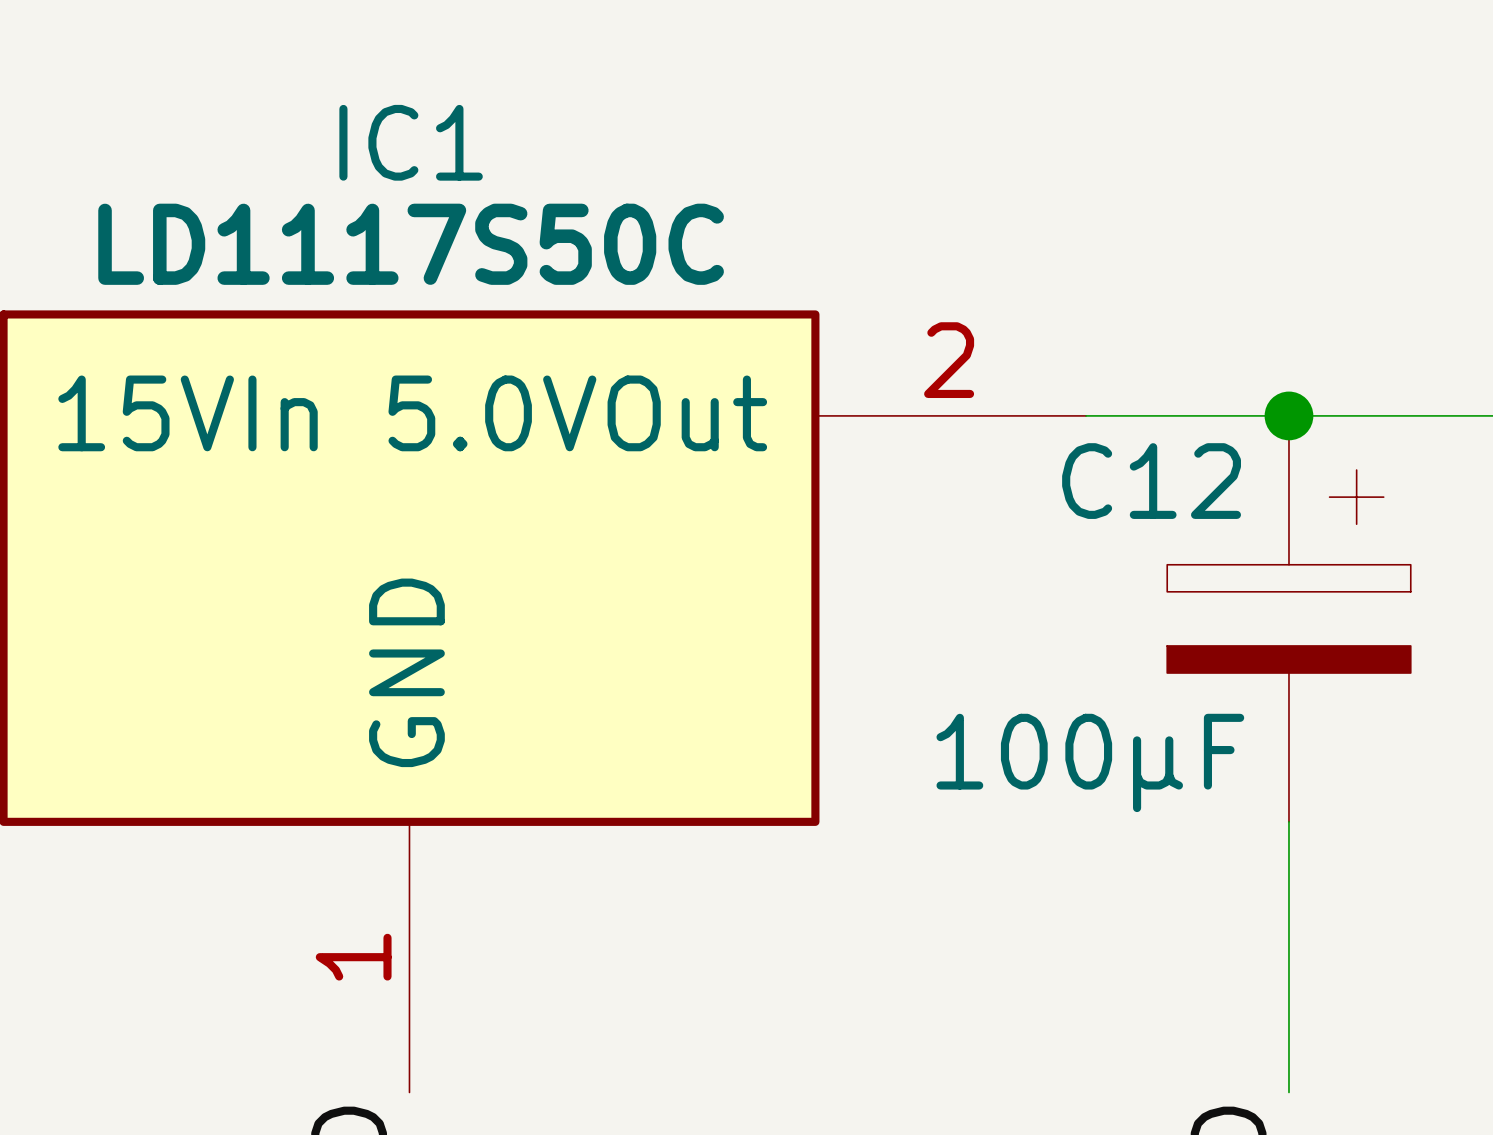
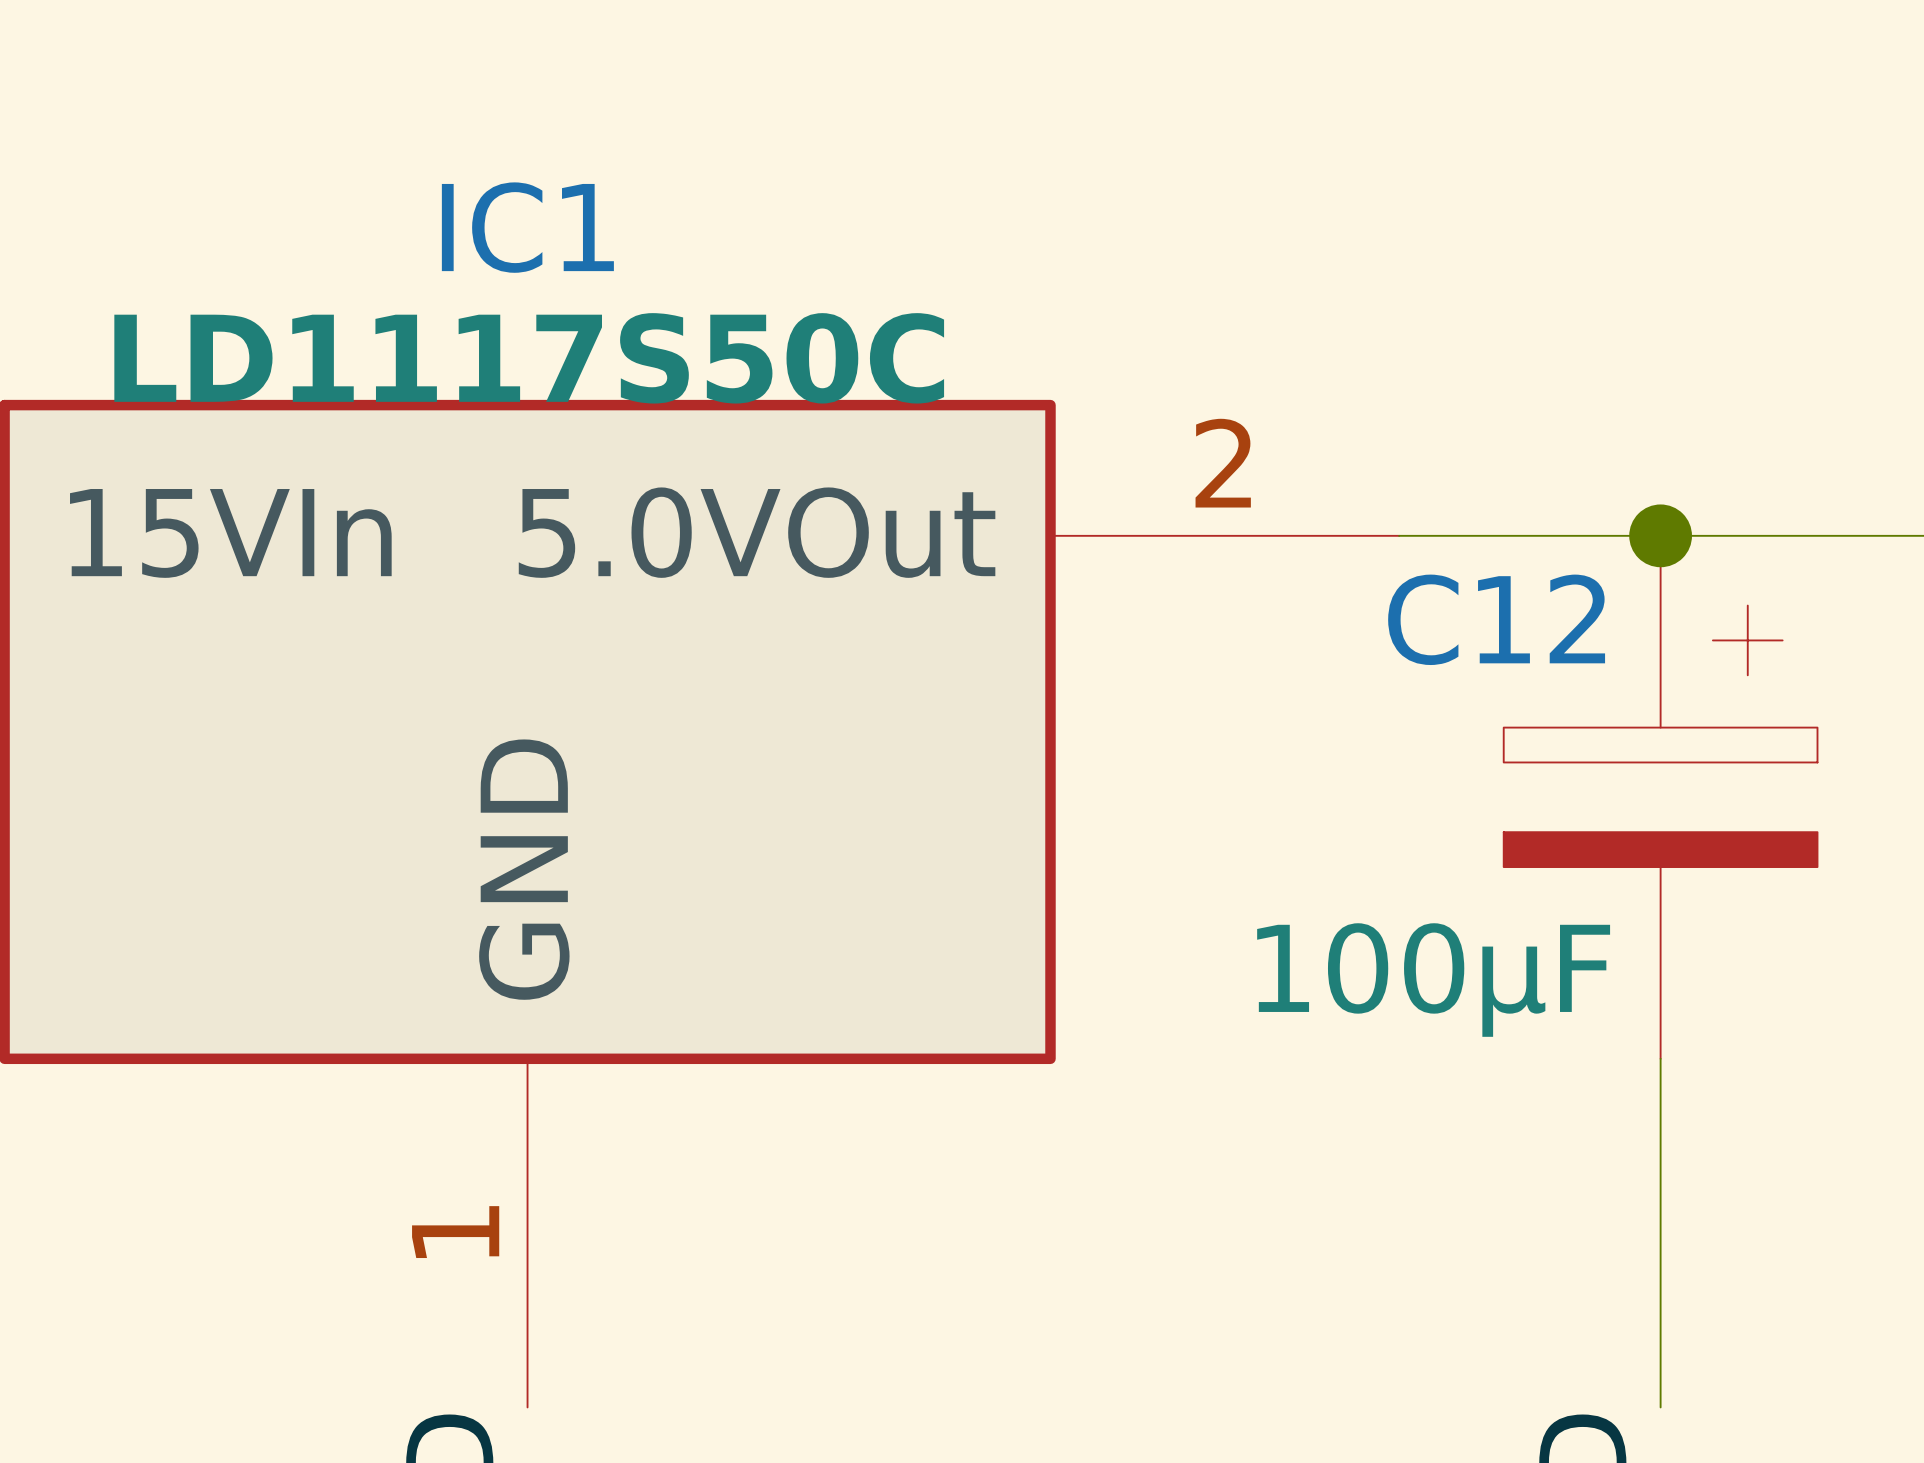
IC1 name position: IC1 (411, 142) -> IC1 (527, 227)
IC1 value position: LD1117S50C (411, 244) -> LD1117S50C (529, 358)

